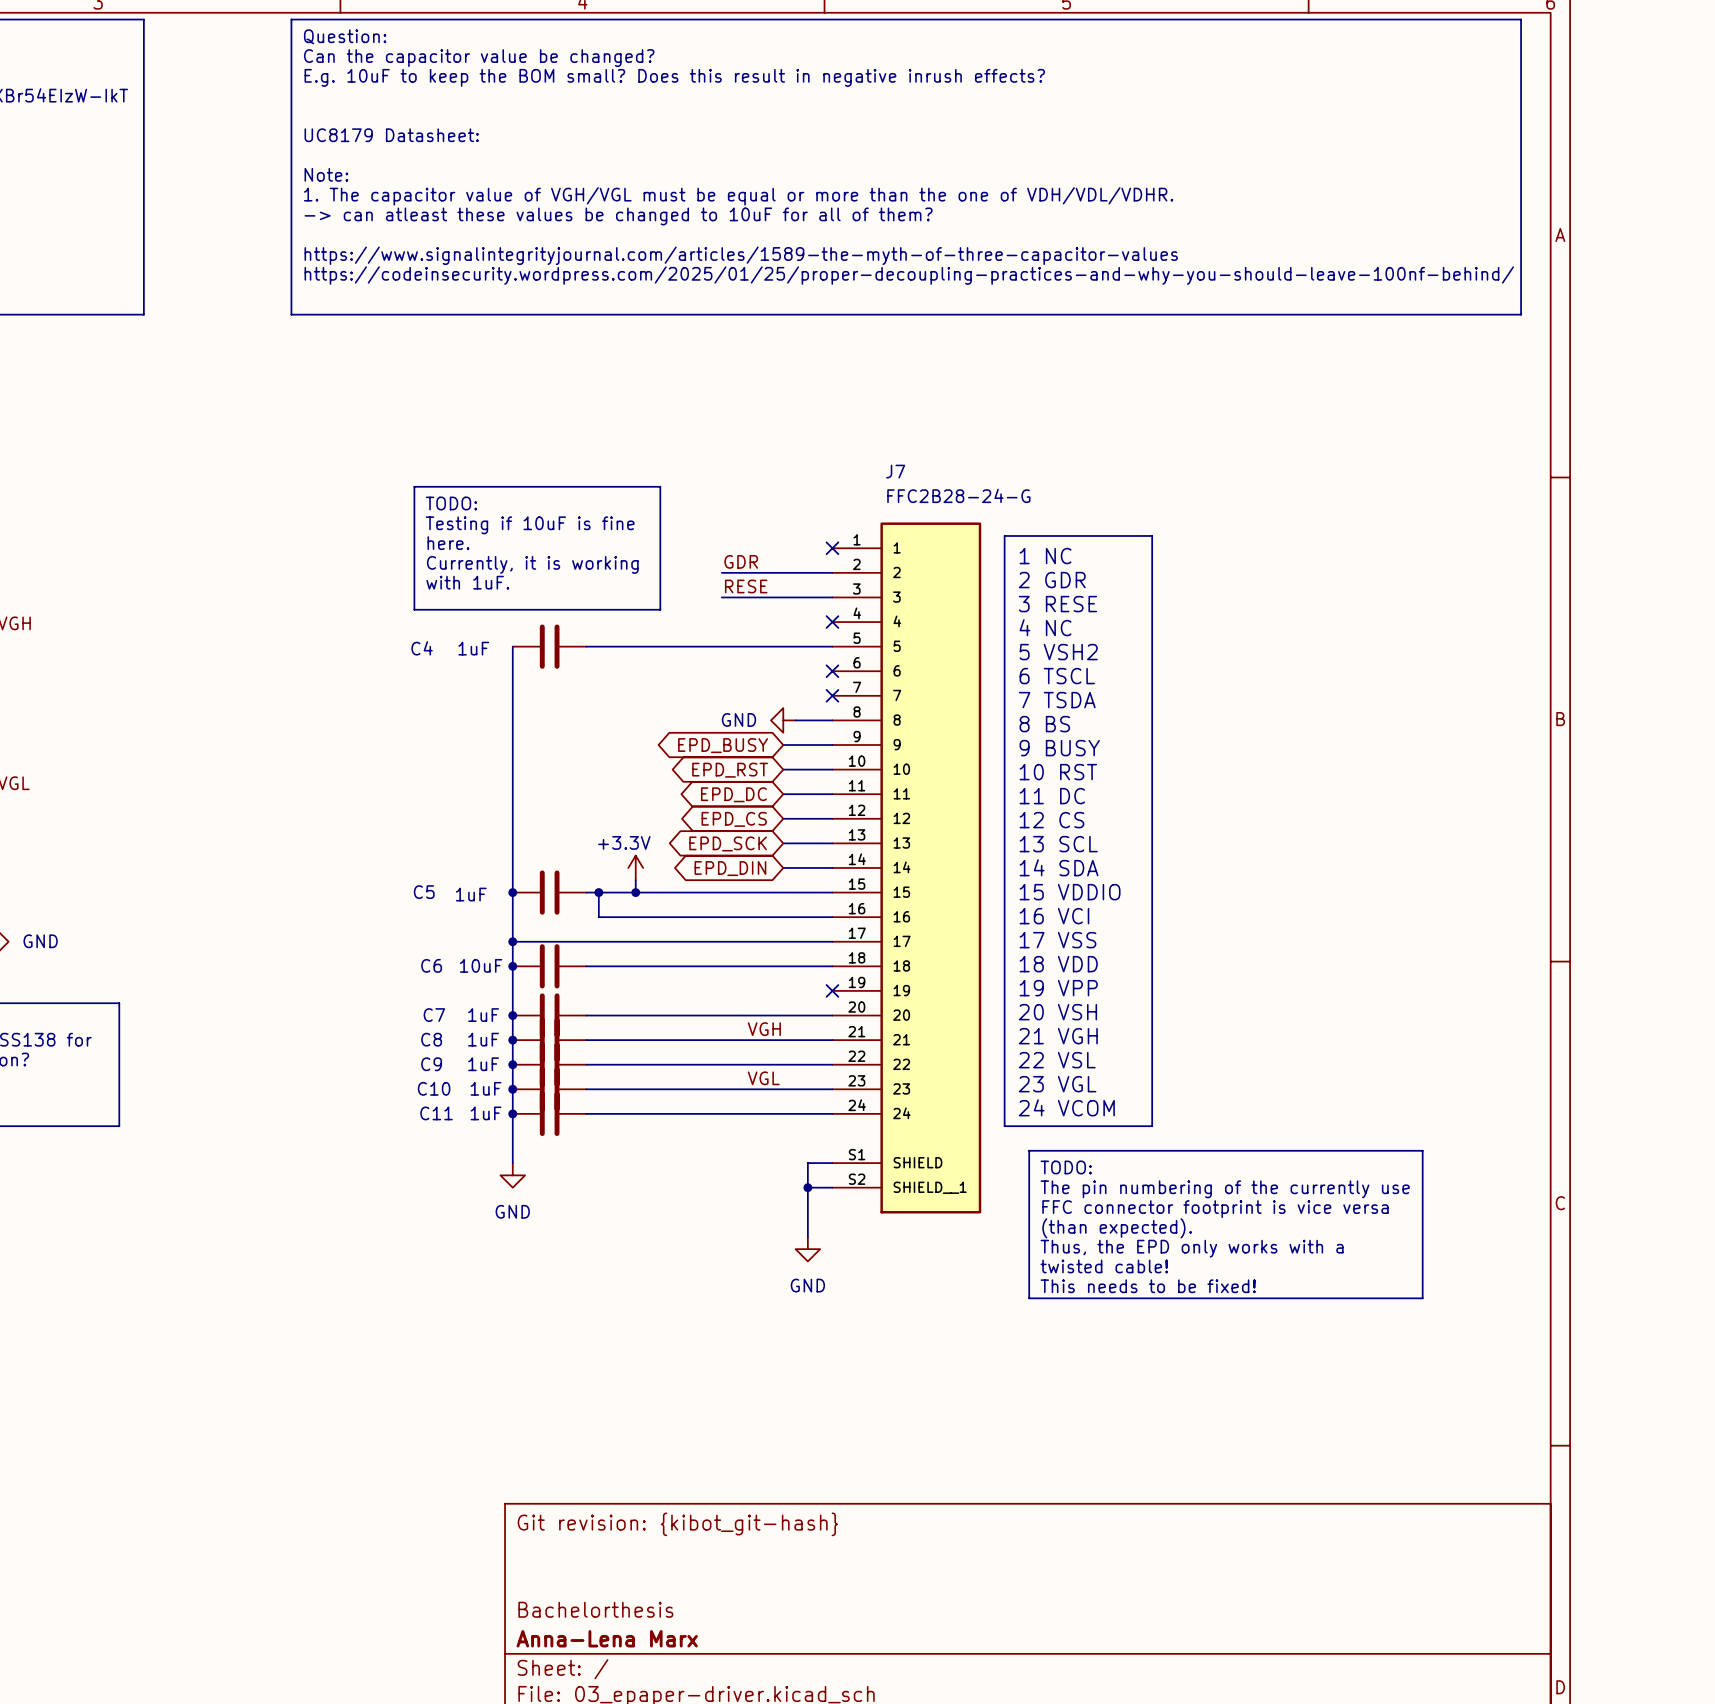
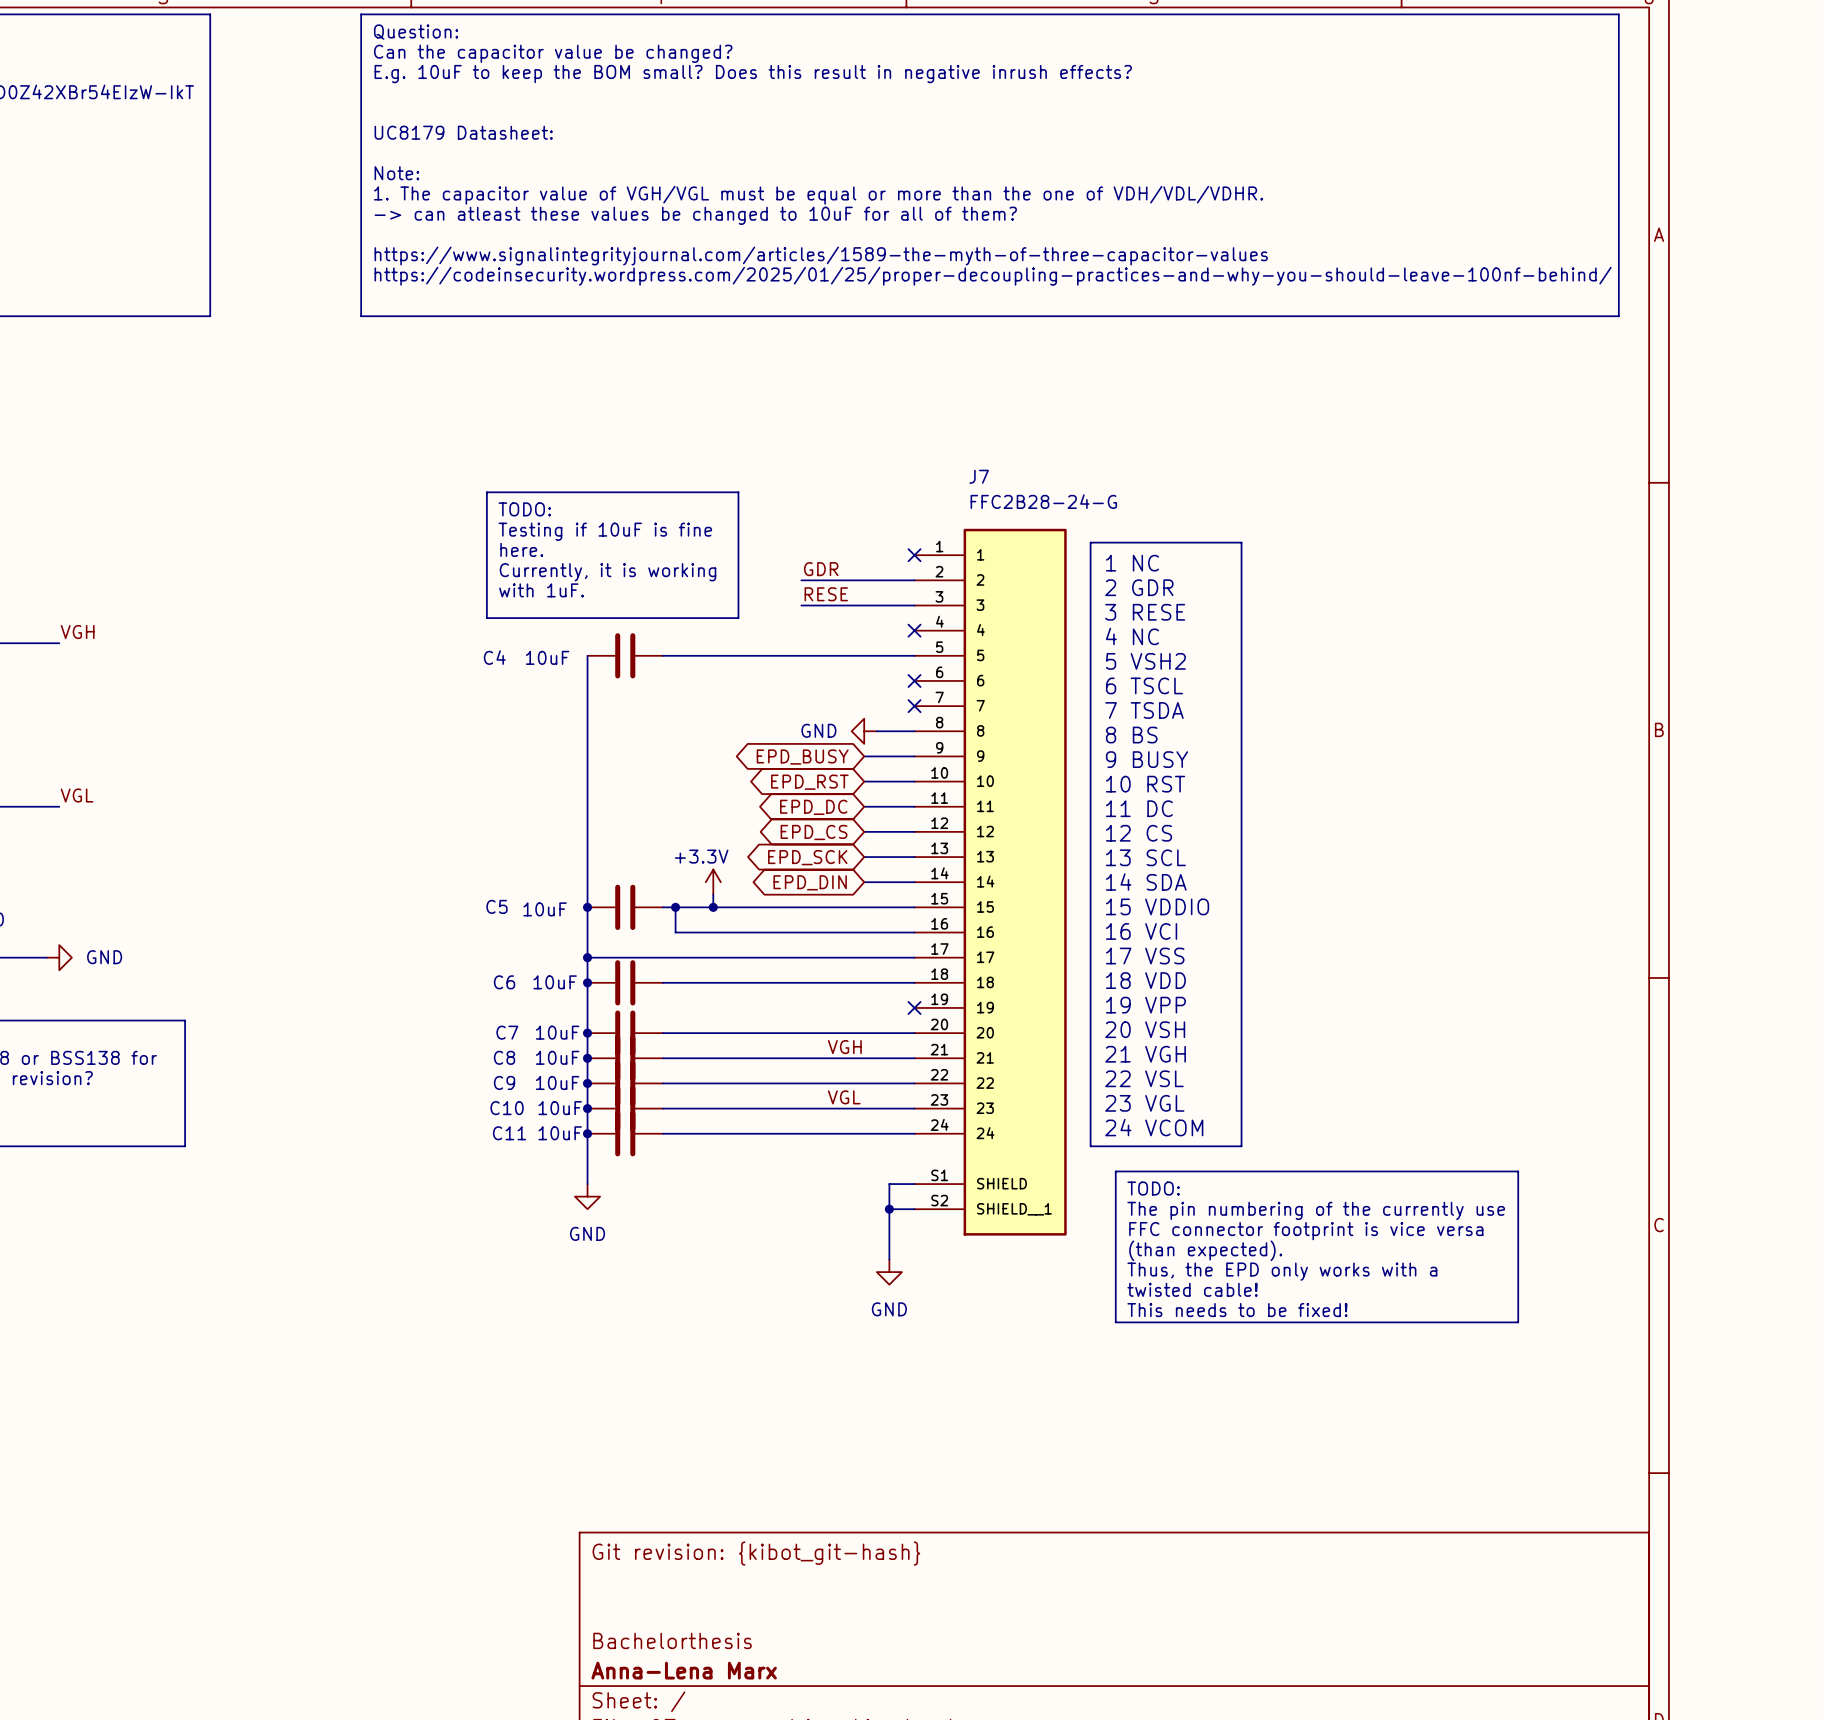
C4 value: 1uF (473, 648) -> 10uF (547, 657)
C5 value: 1uF (471, 894) -> 10uF (545, 909)
C7 value: 1uF (483, 1015) -> 10uF (557, 1032)
C8 value: 1uF (483, 1039) -> 10uF (557, 1057)
C9 value: 1uF (483, 1064) -> 10uF (557, 1082)
C10 value: 1uF (486, 1088) -> 10uF (560, 1108)
C11 value: 1uF (486, 1113) -> 10uF (560, 1133)

